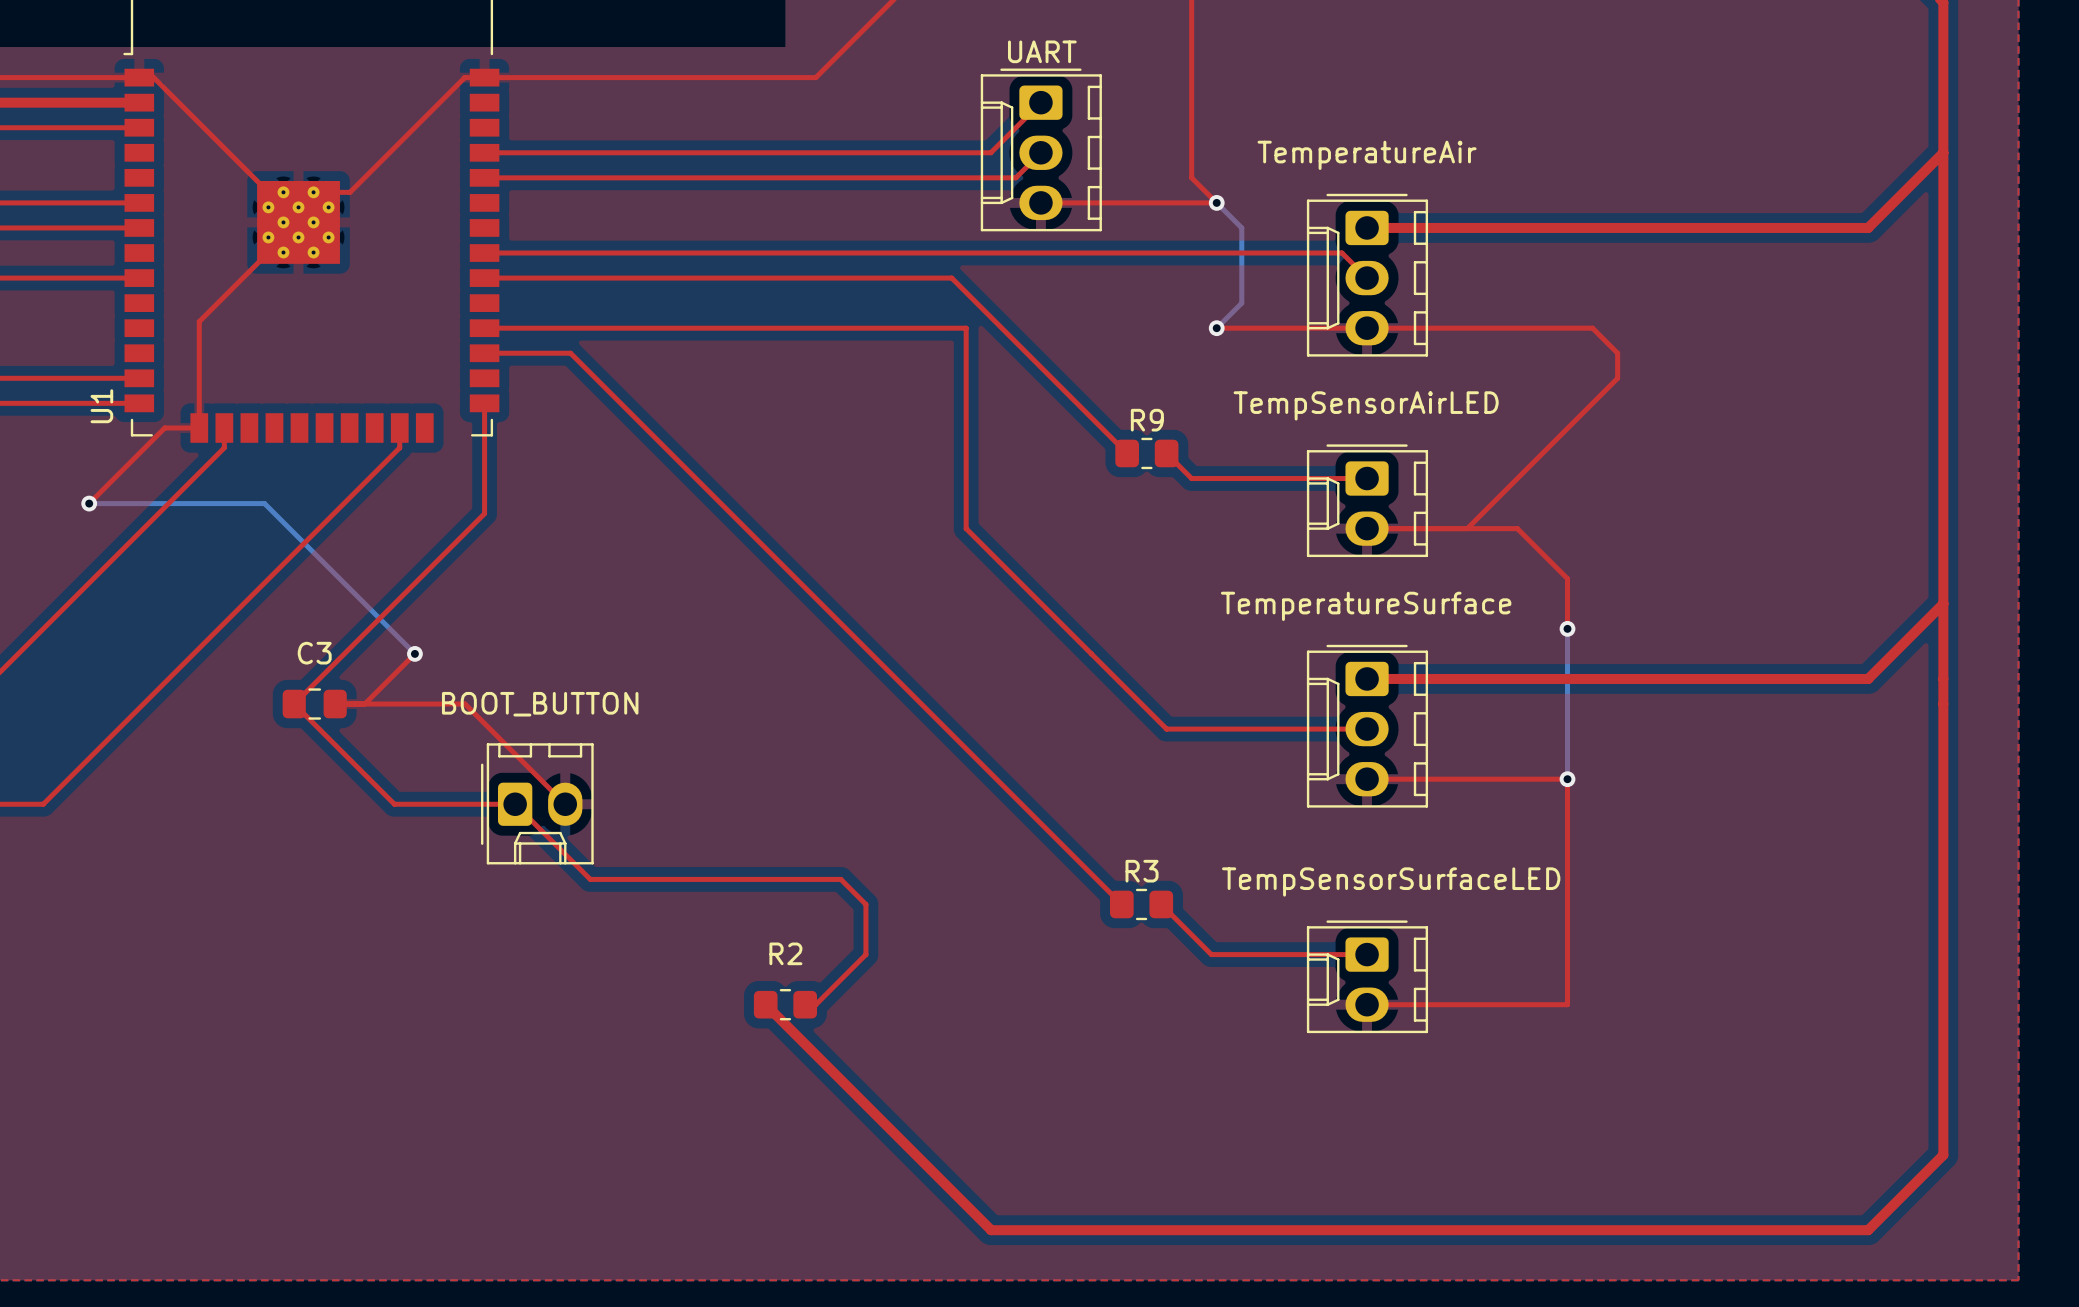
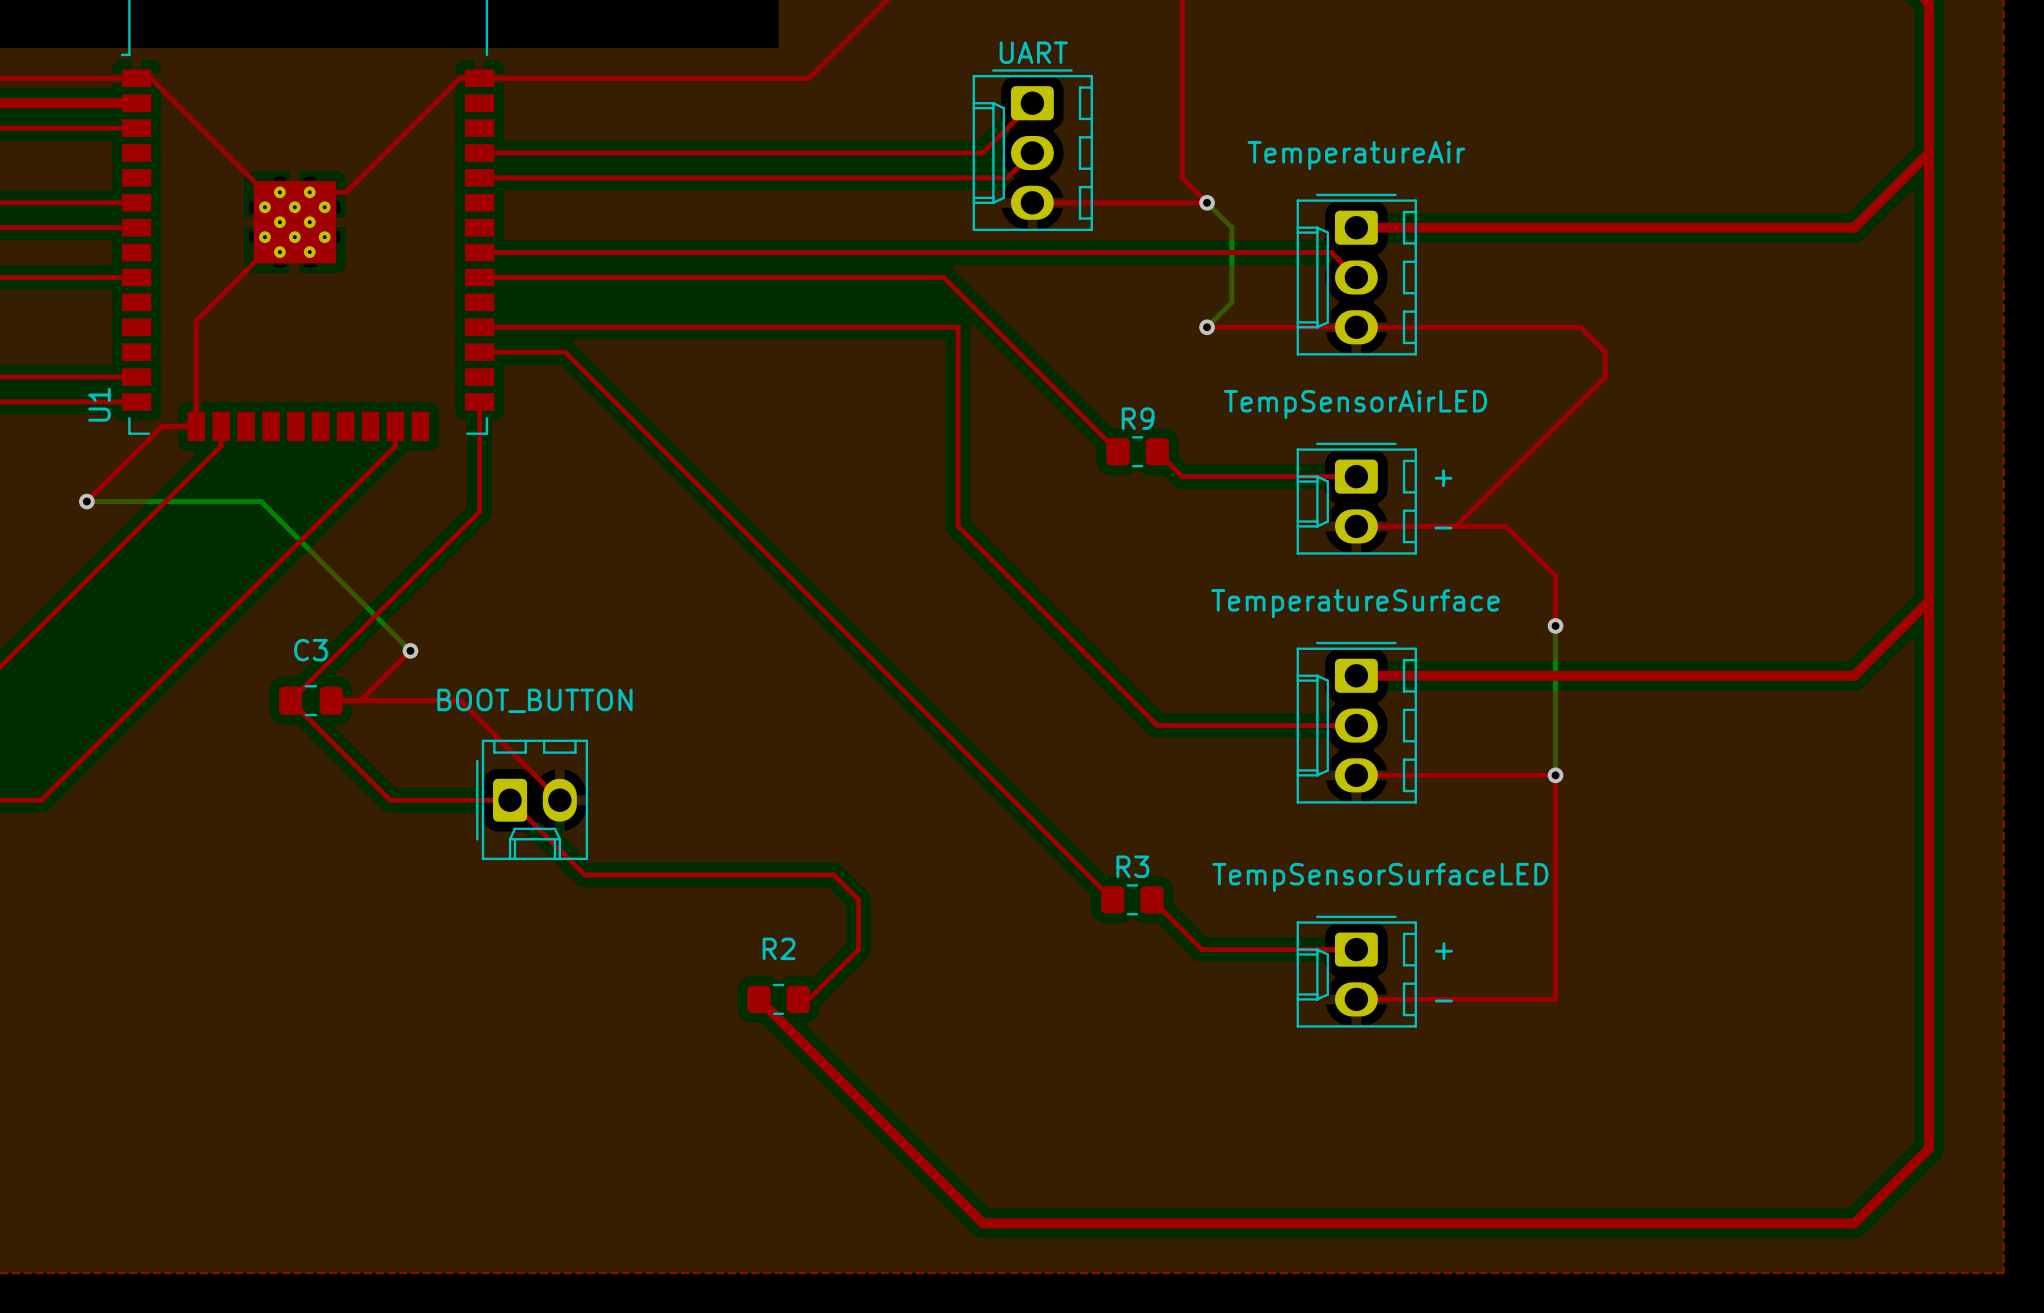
part text: none -> + (1443, 478)
part text: none -> - (1443, 528)
part text: none -> + (1443, 951)
part text: none -> - (1443, 1000)

